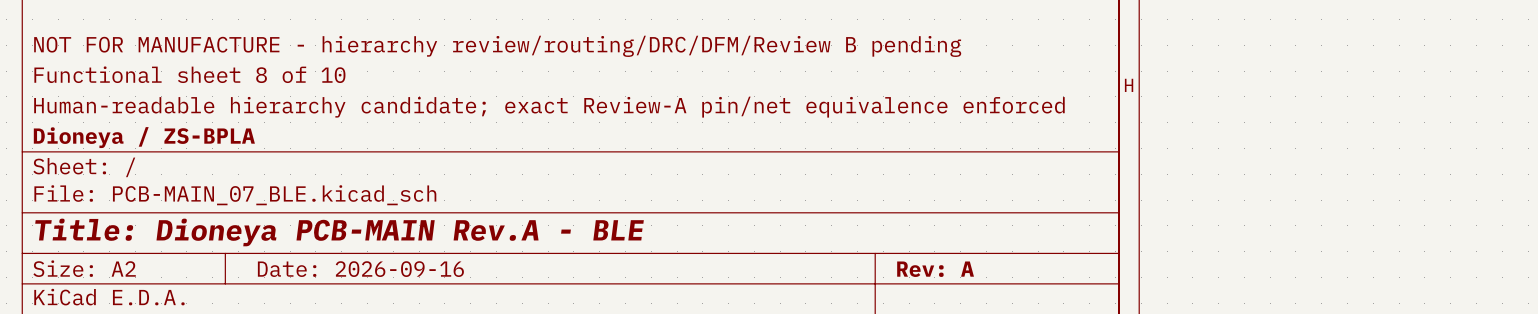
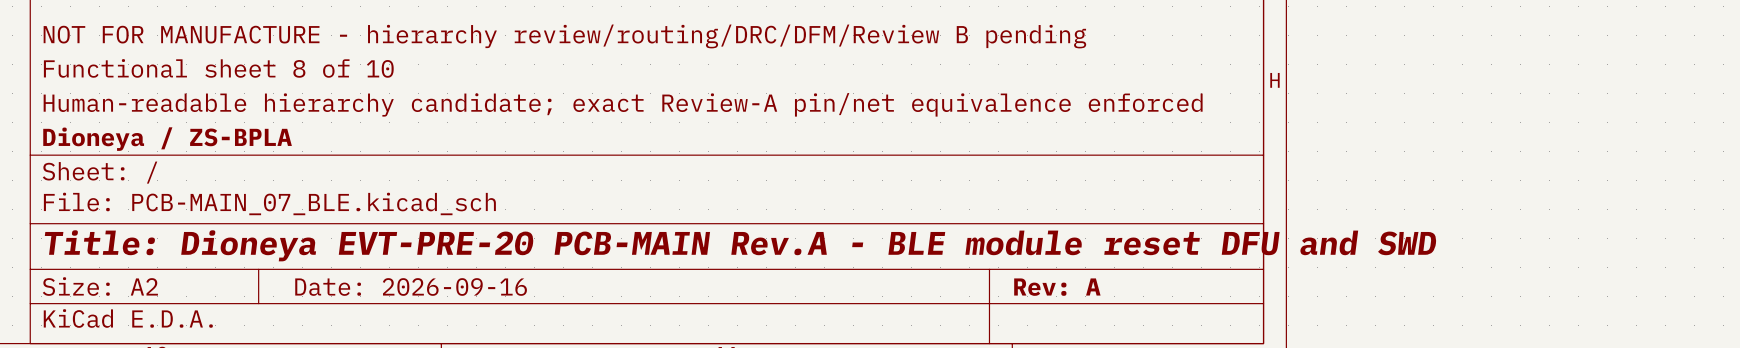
title block: Title: Dioneya PCB-MAIN Rev.A - BLE (339, 232) -> Title: Dioneya EVT-PRE-20 PCB-MAIN Rev.A - BLE module reset DFU and SWD (740, 245)

